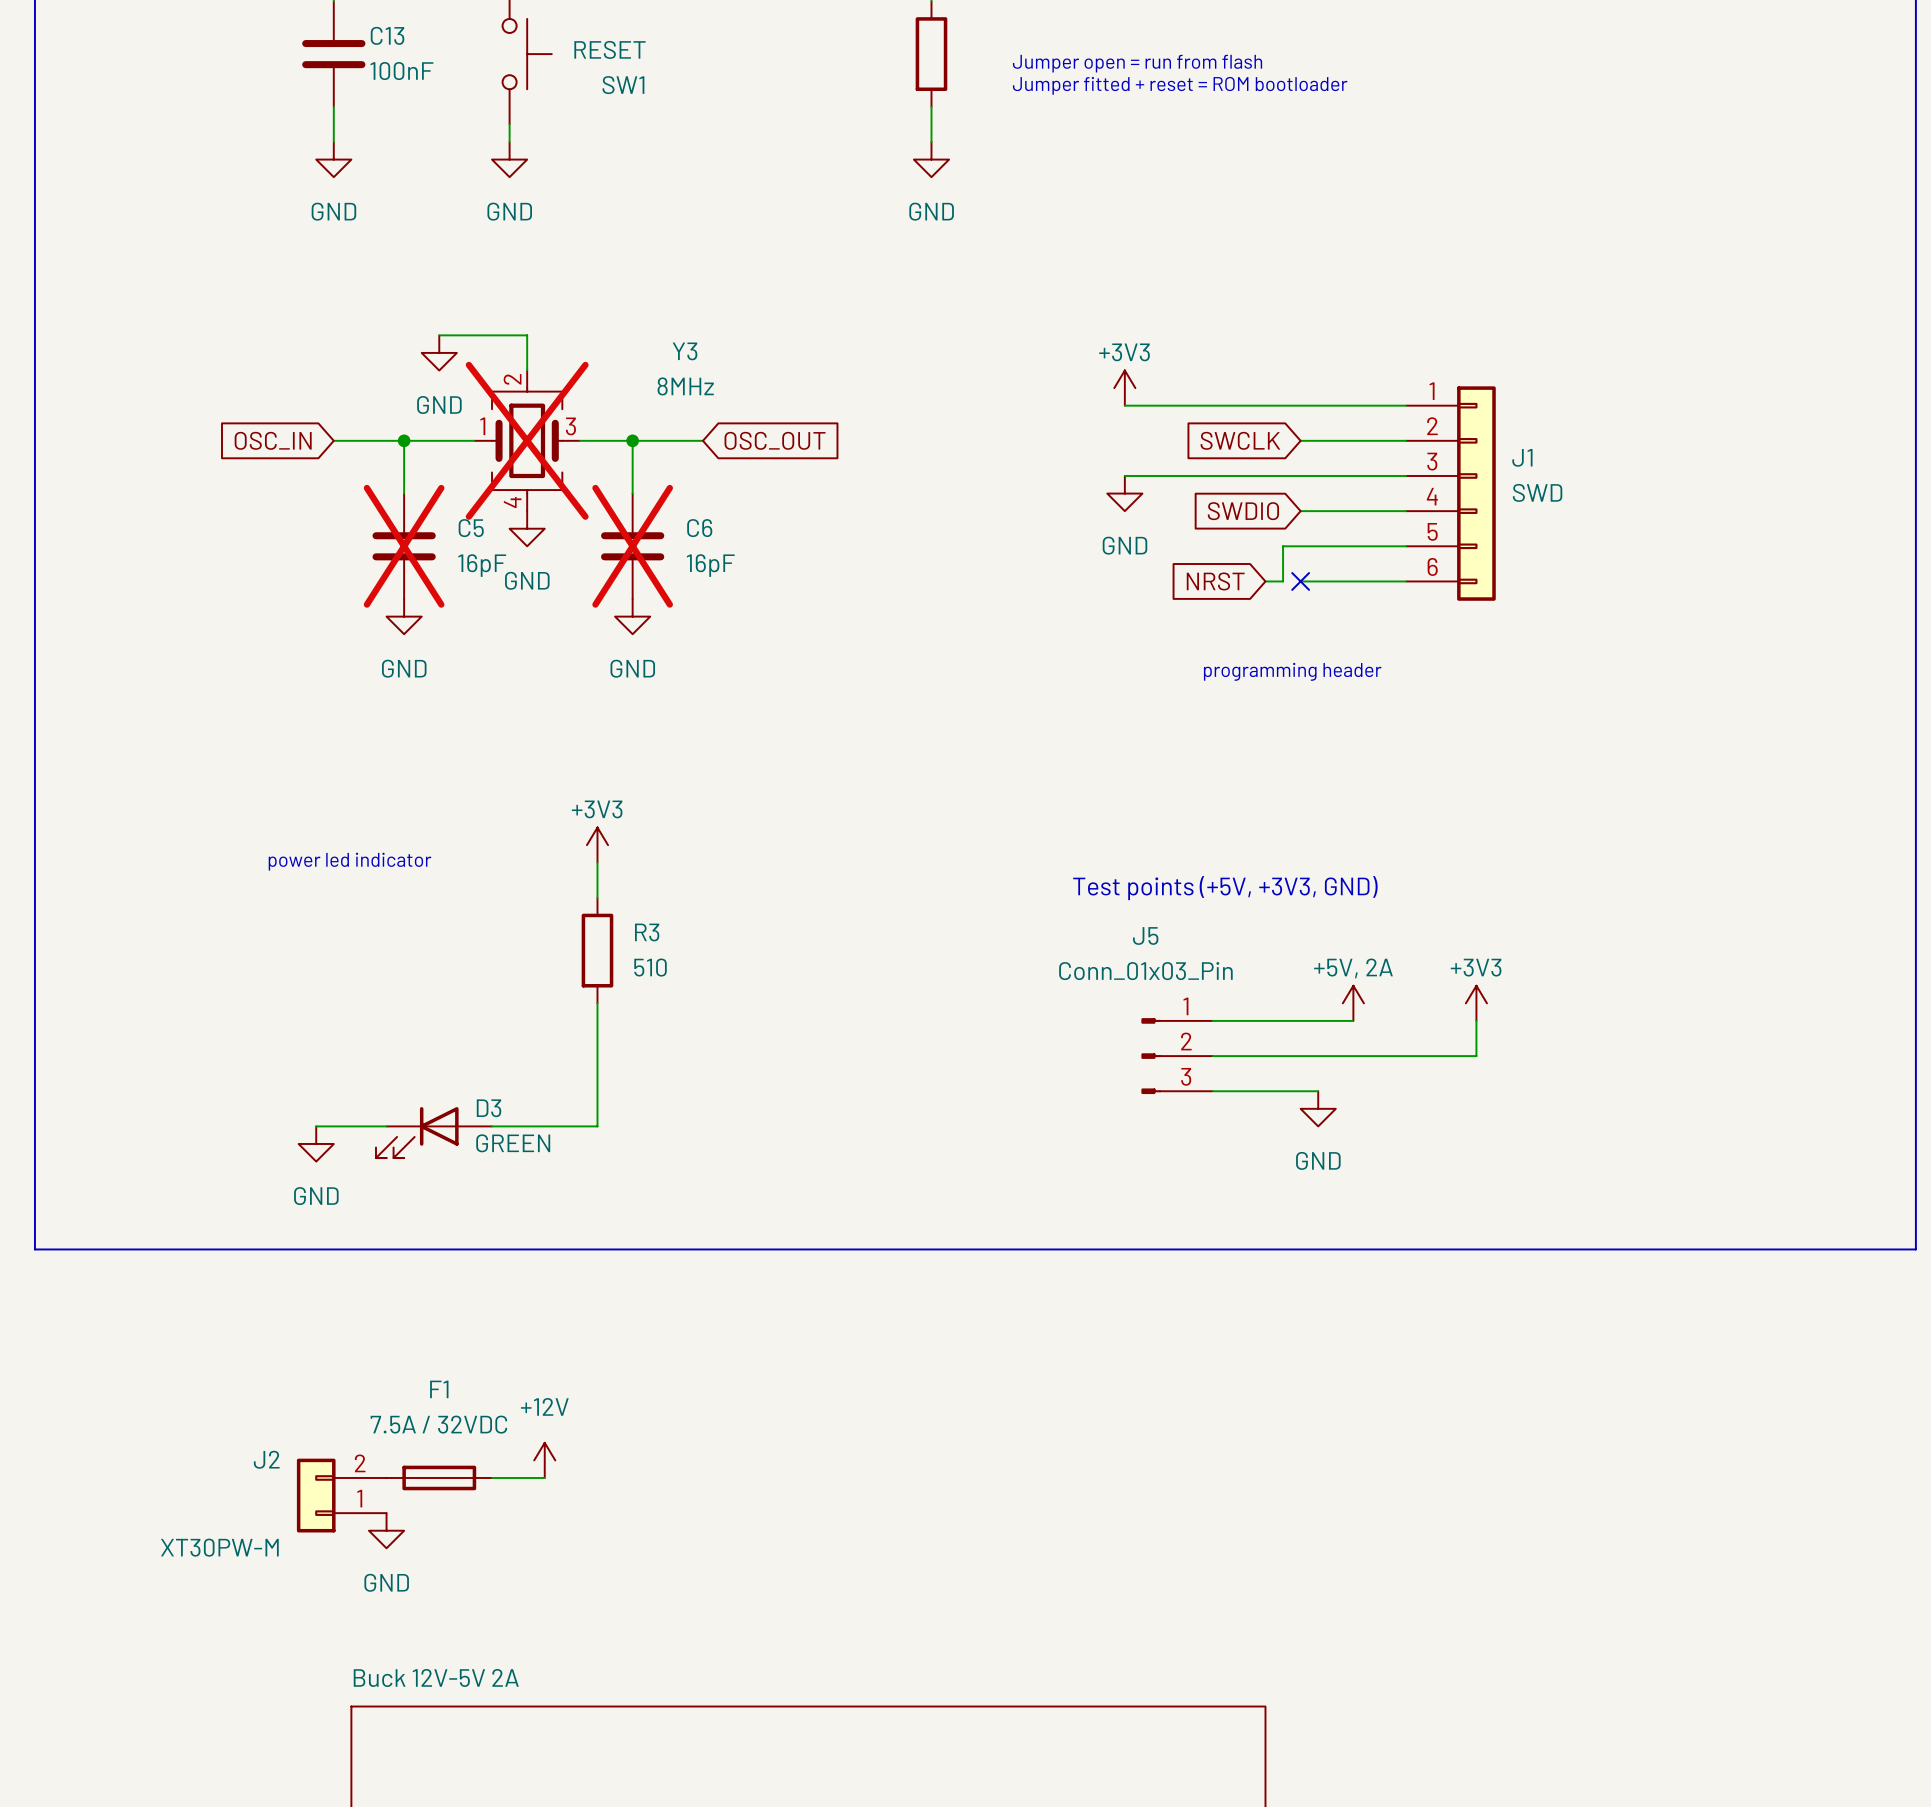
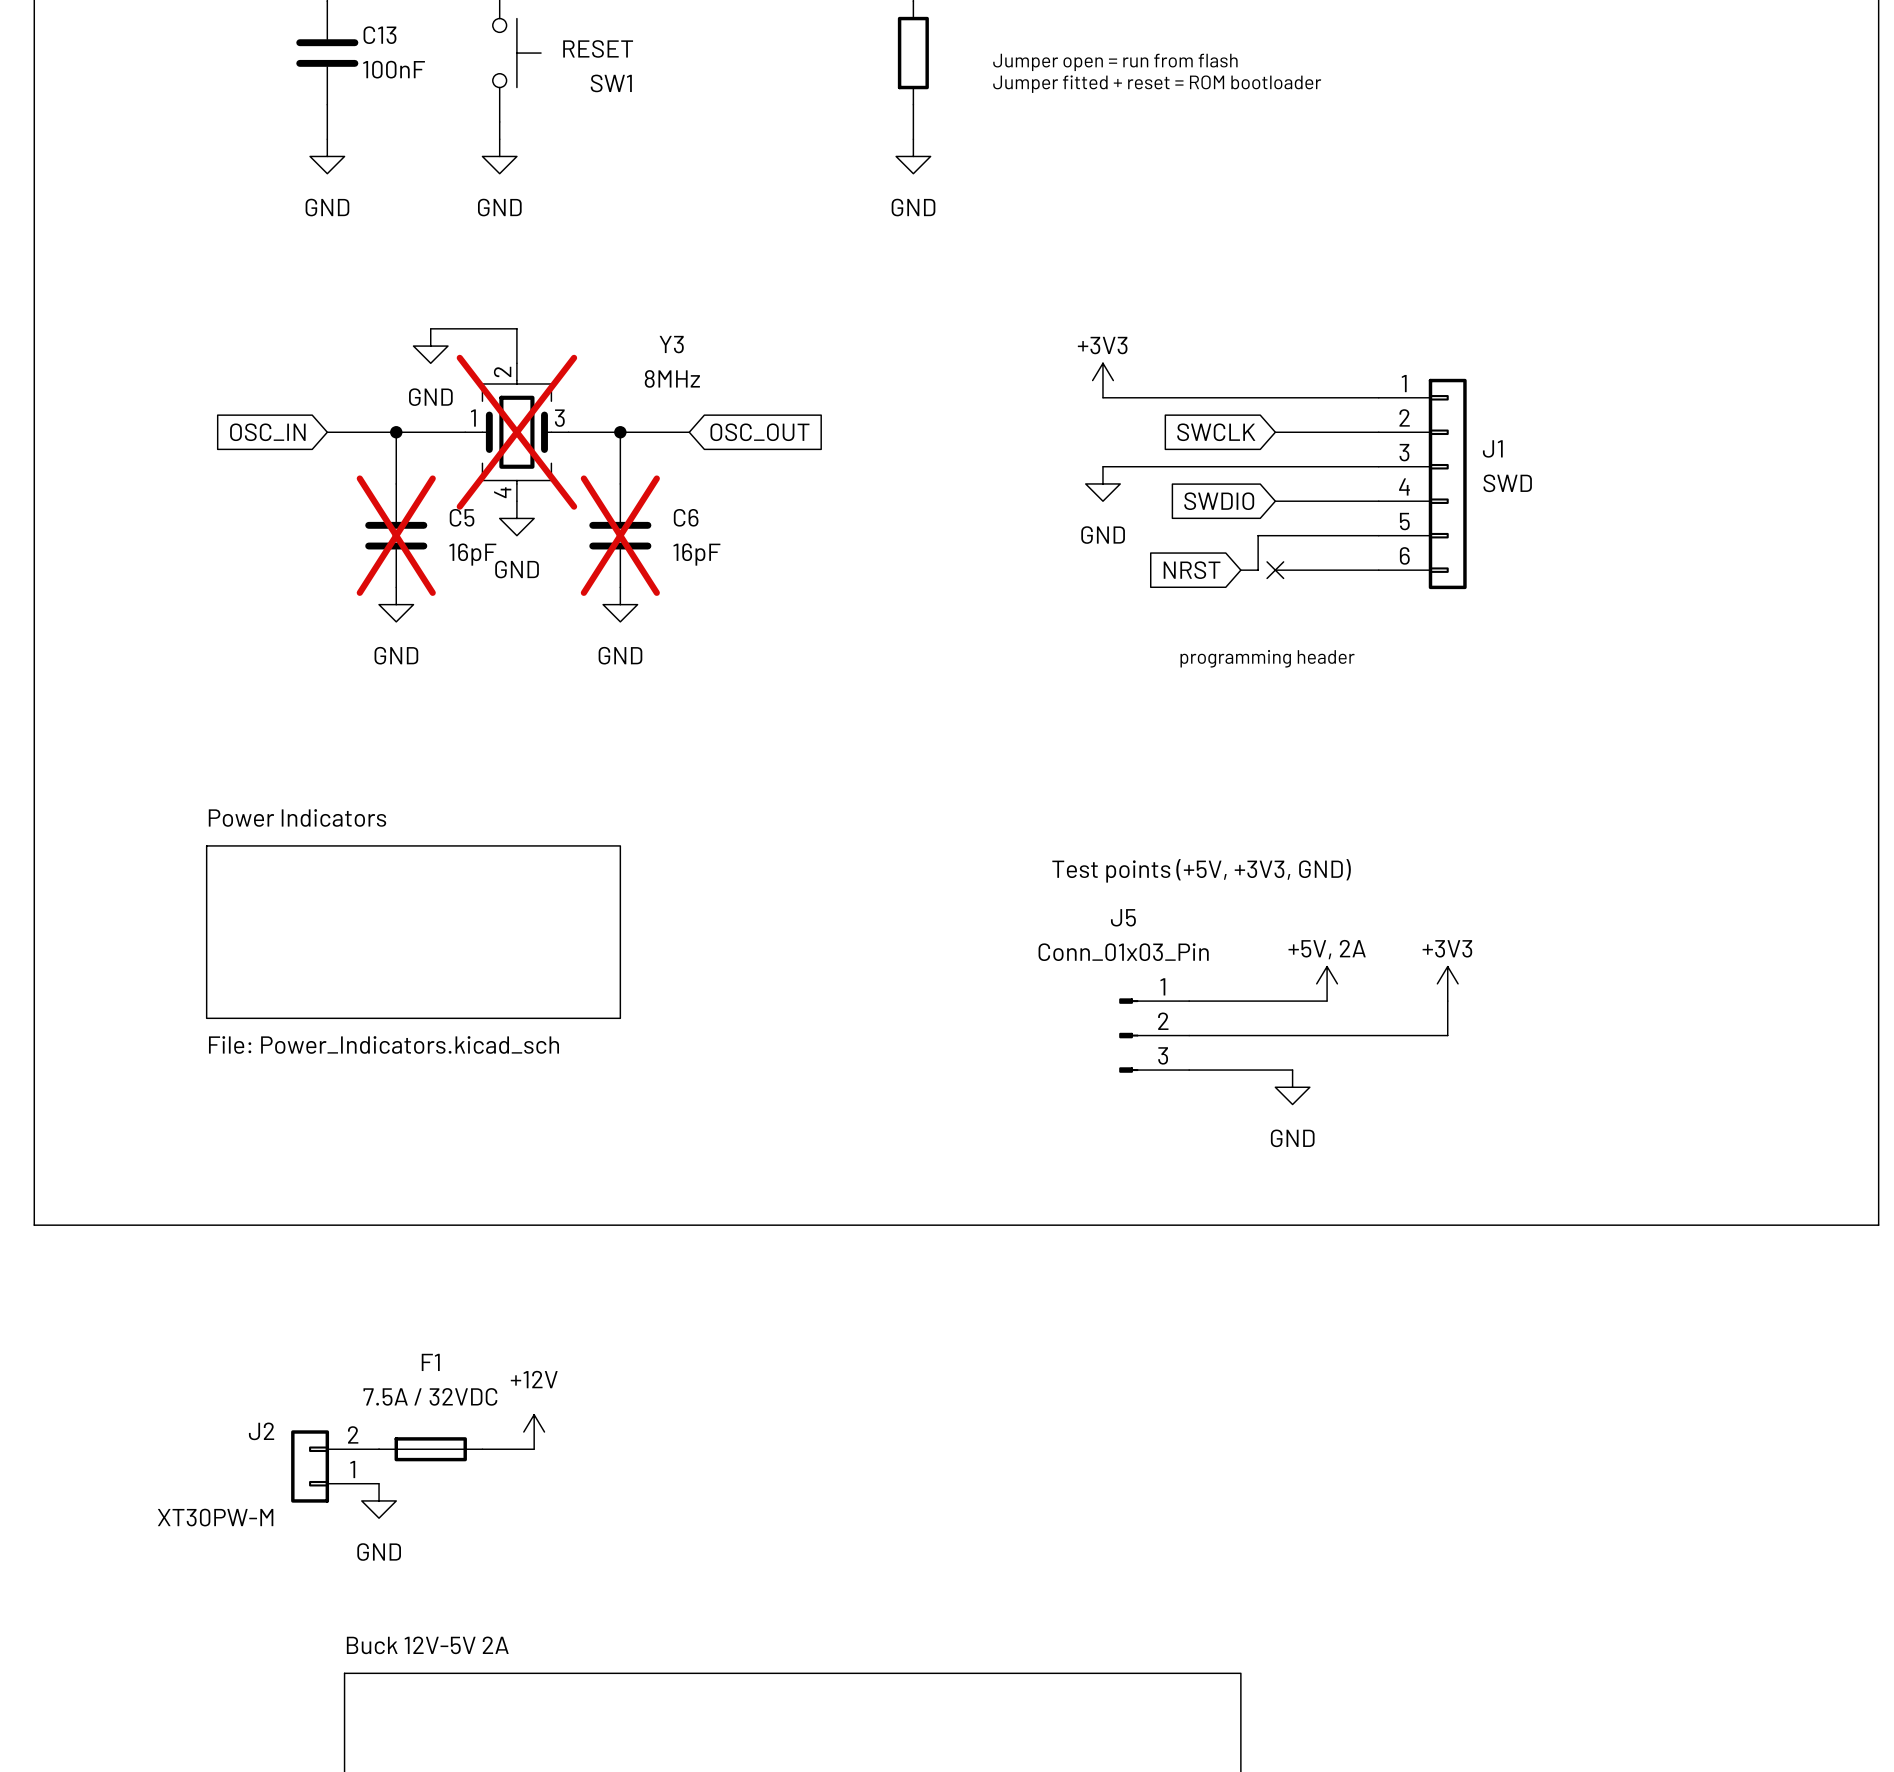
power symbol: +3V3 (597, 845) -> none
text: power led indicator (350, 861) -> none
wire: (597, 862) (597, 897) -> none
sheet Power Indicators: none -> File: Power_Indicators.kicad_sch (413, 932)
R3: 510 (597, 950) -> none
wire: (597, 1003) (597, 1126) (492, 1126) -> none
wire: (316, 1126) (386, 1126) -> none
D3: GREEN (434, 1132) -> none
power symbol: GND (316, 1143) -> none

